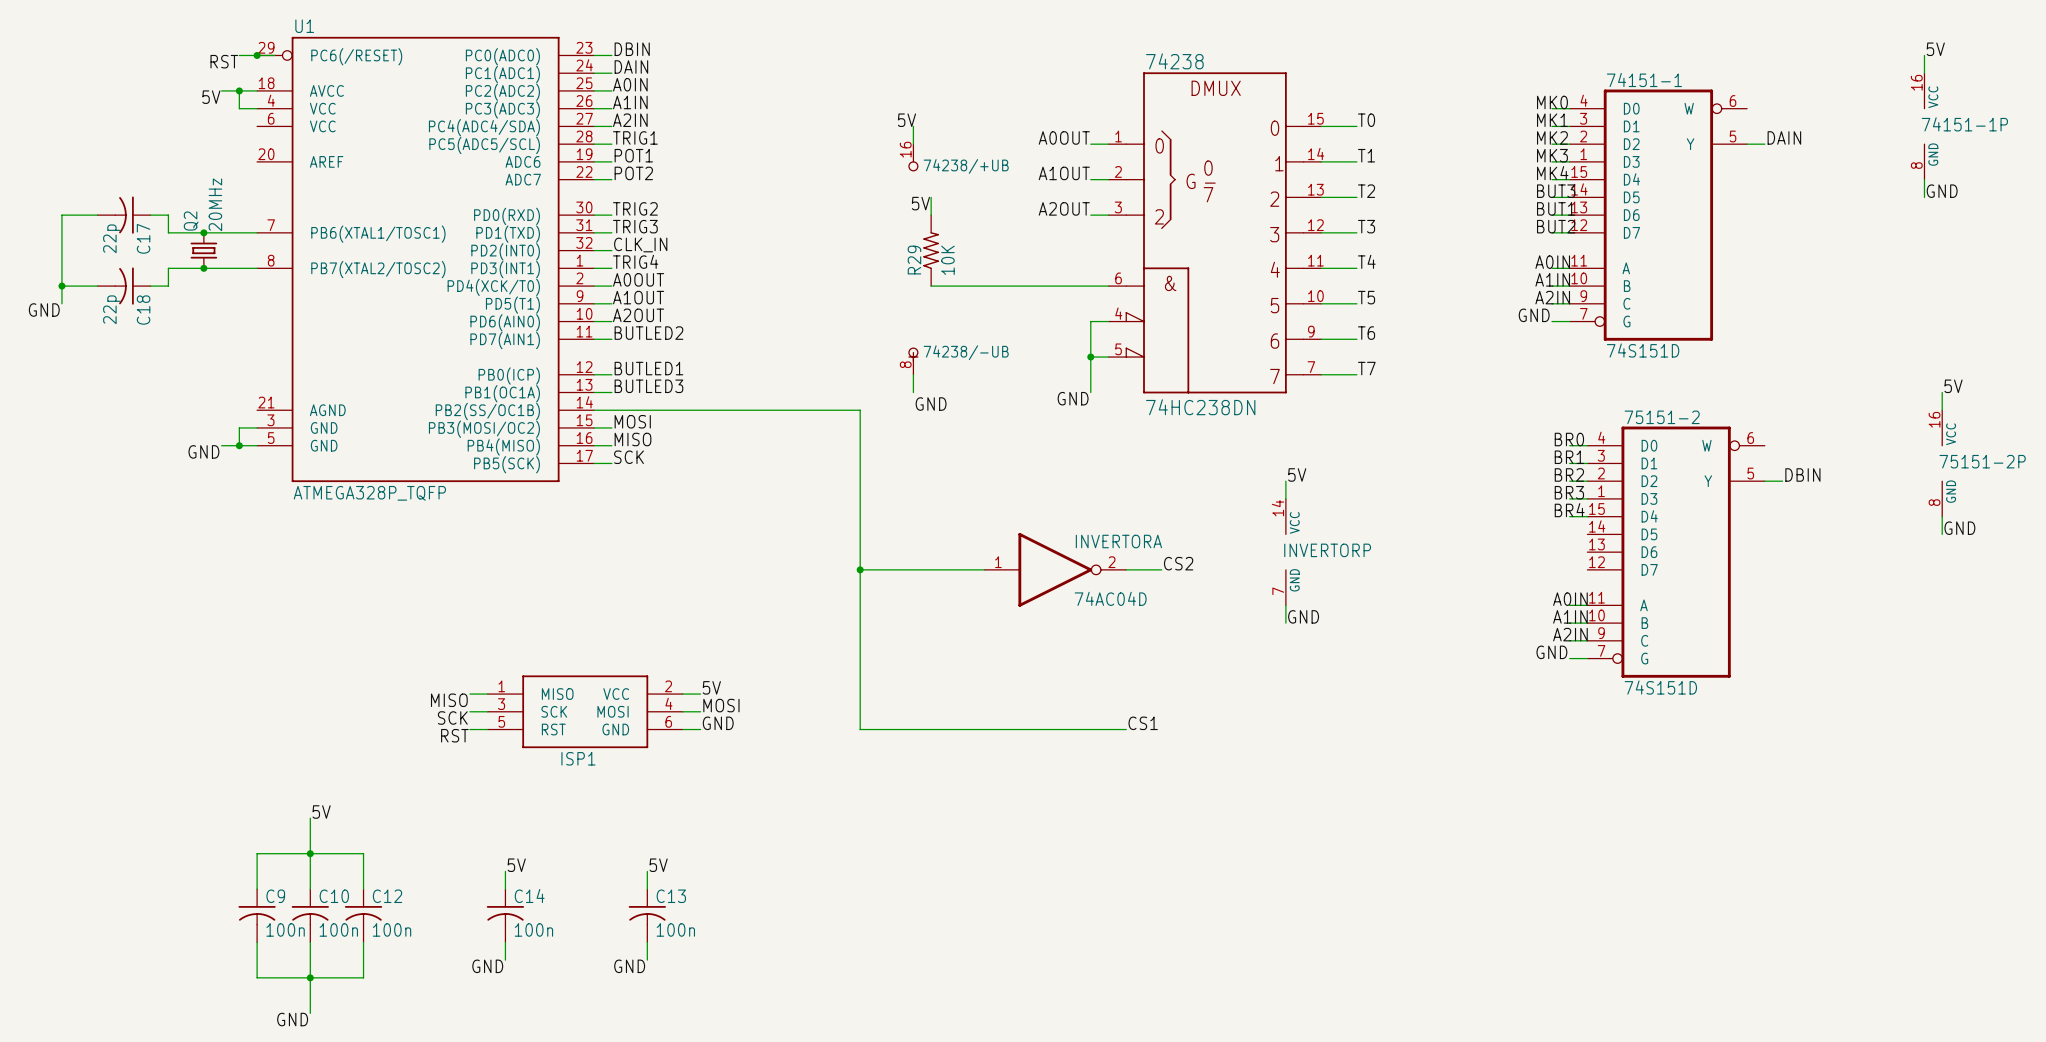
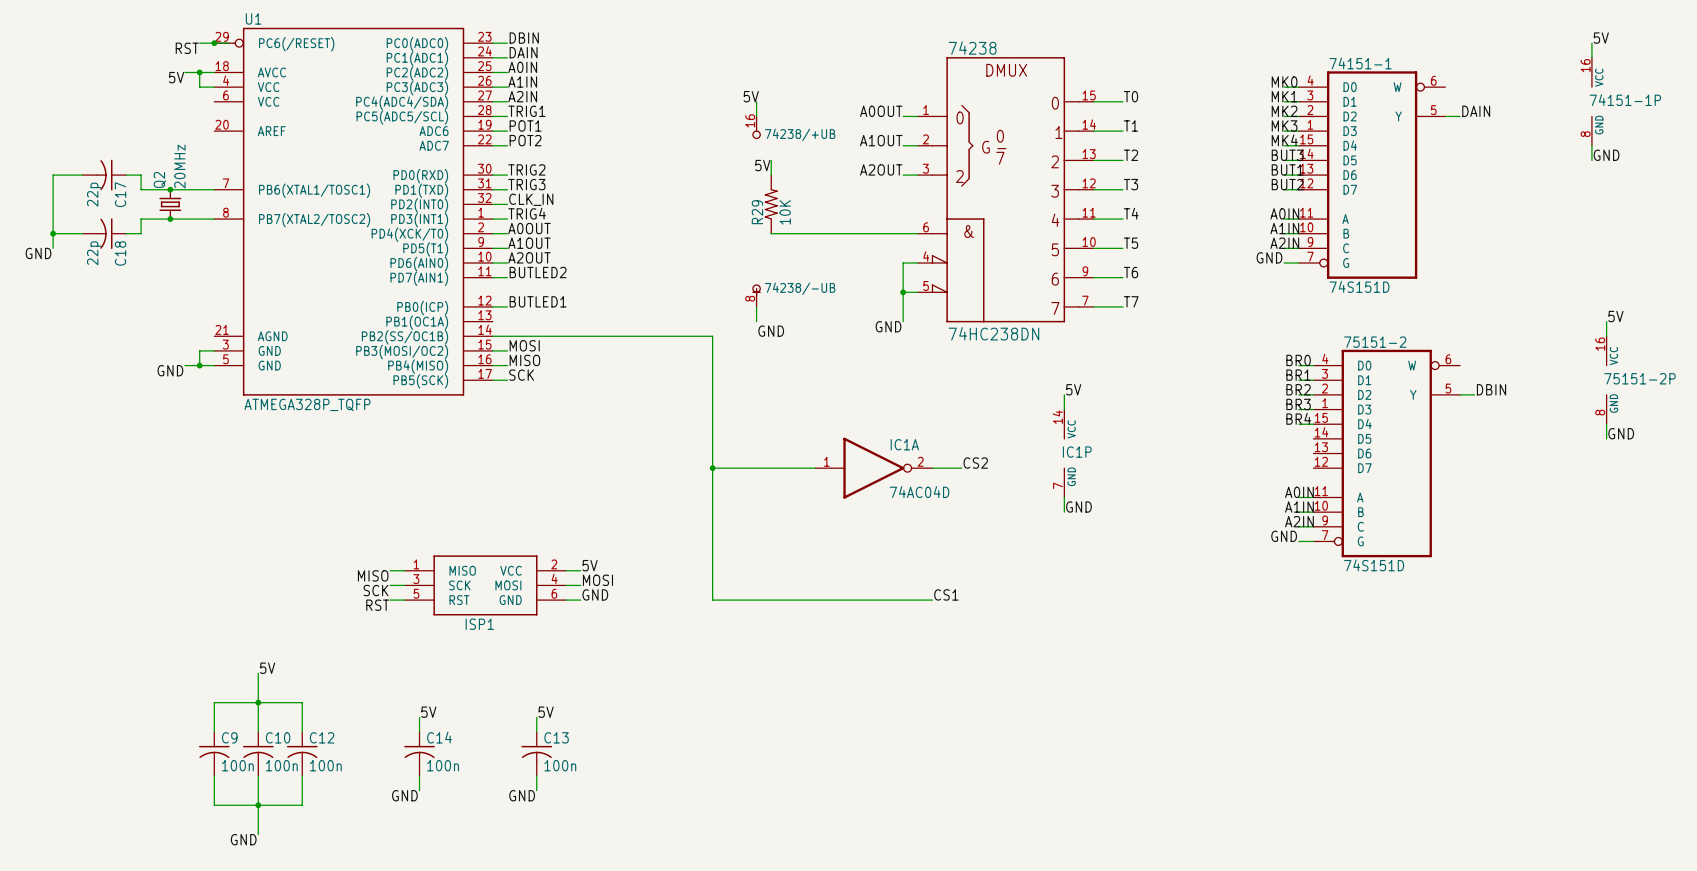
label: BUTLED3 (648, 386) -> none
wire: (594, 392) (611, 392) -> none
INVERTORA name: INVERTORA (1118, 541) -> IC1A (904, 444)
INVERTORP name: INVERTORP (1327, 550) -> IC1P (1077, 452)

